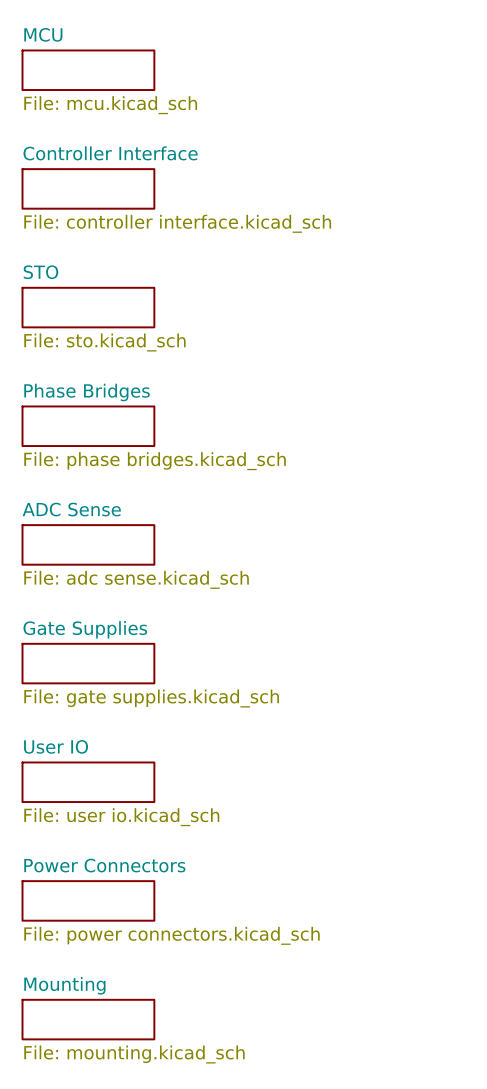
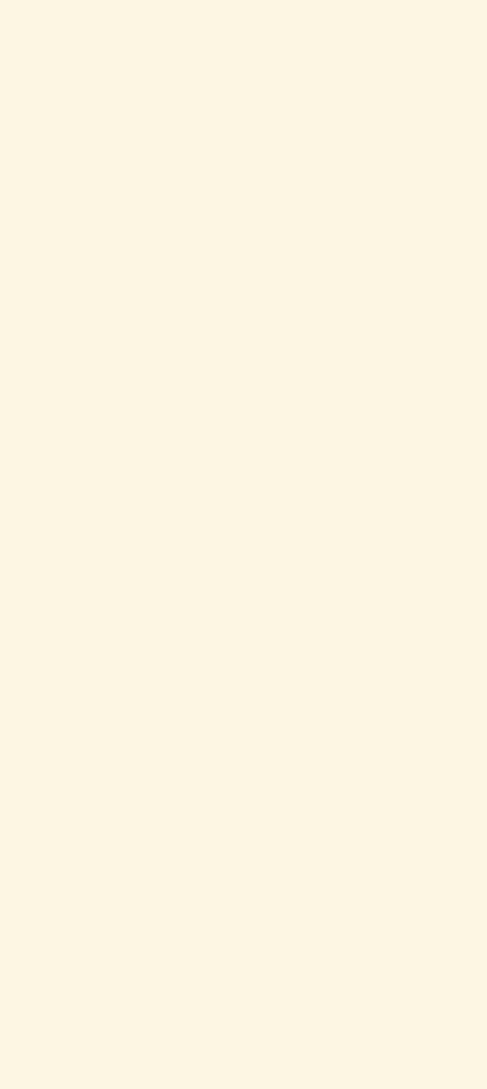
sheet MCU: File: mcu.kicad_sch (88, 70) -> none
sheet Controller Interface: File: controller interface.kicad_sch (88, 188) -> none
sheet STO: File: sto.kicad_sch (88, 307) -> none
sheet Phase Bridges: File: phase bridges.kicad_sch (88, 426) -> none
sheet ADC Sense: File: adc sense.kicad_sch (88, 544) -> none
sheet Gate Supplies: File: gate supplies.kicad_sch (88, 663) -> none
sheet User IO: File: user io.kicad_sch (88, 782) -> none
sheet Power Connectors: File: power connectors.kicad_sch (88, 900) -> none
sheet Mounting: File: mounting.kicad_sch (88, 1019) -> none

